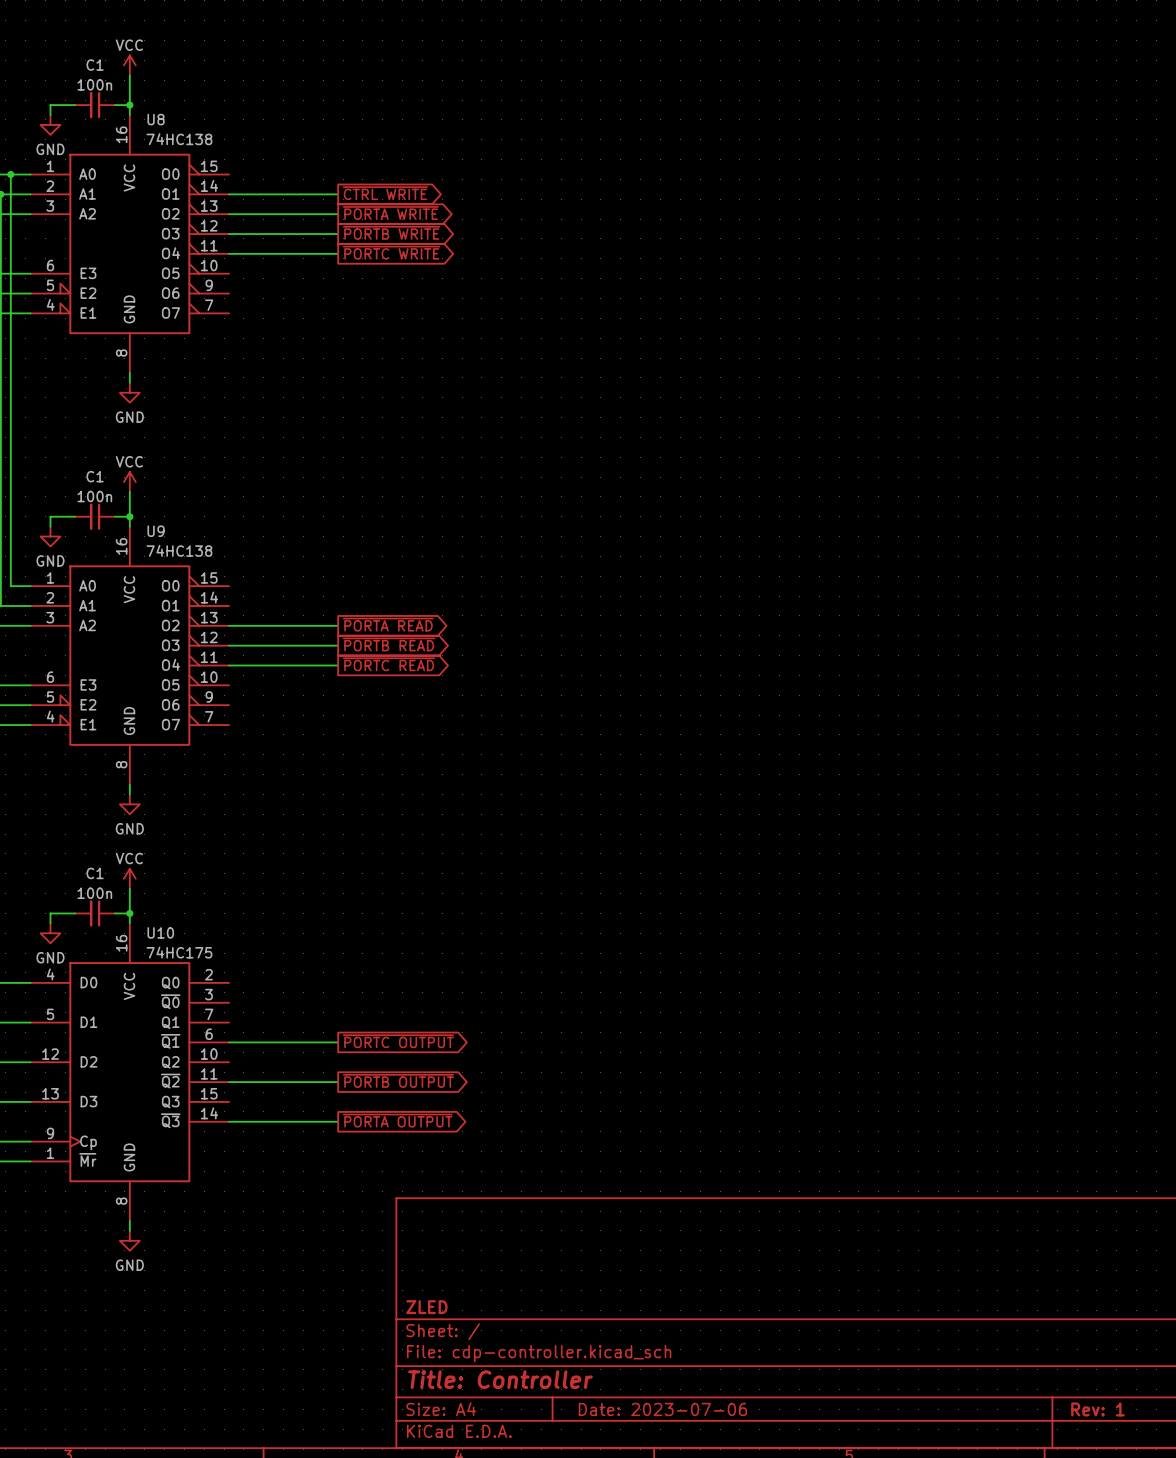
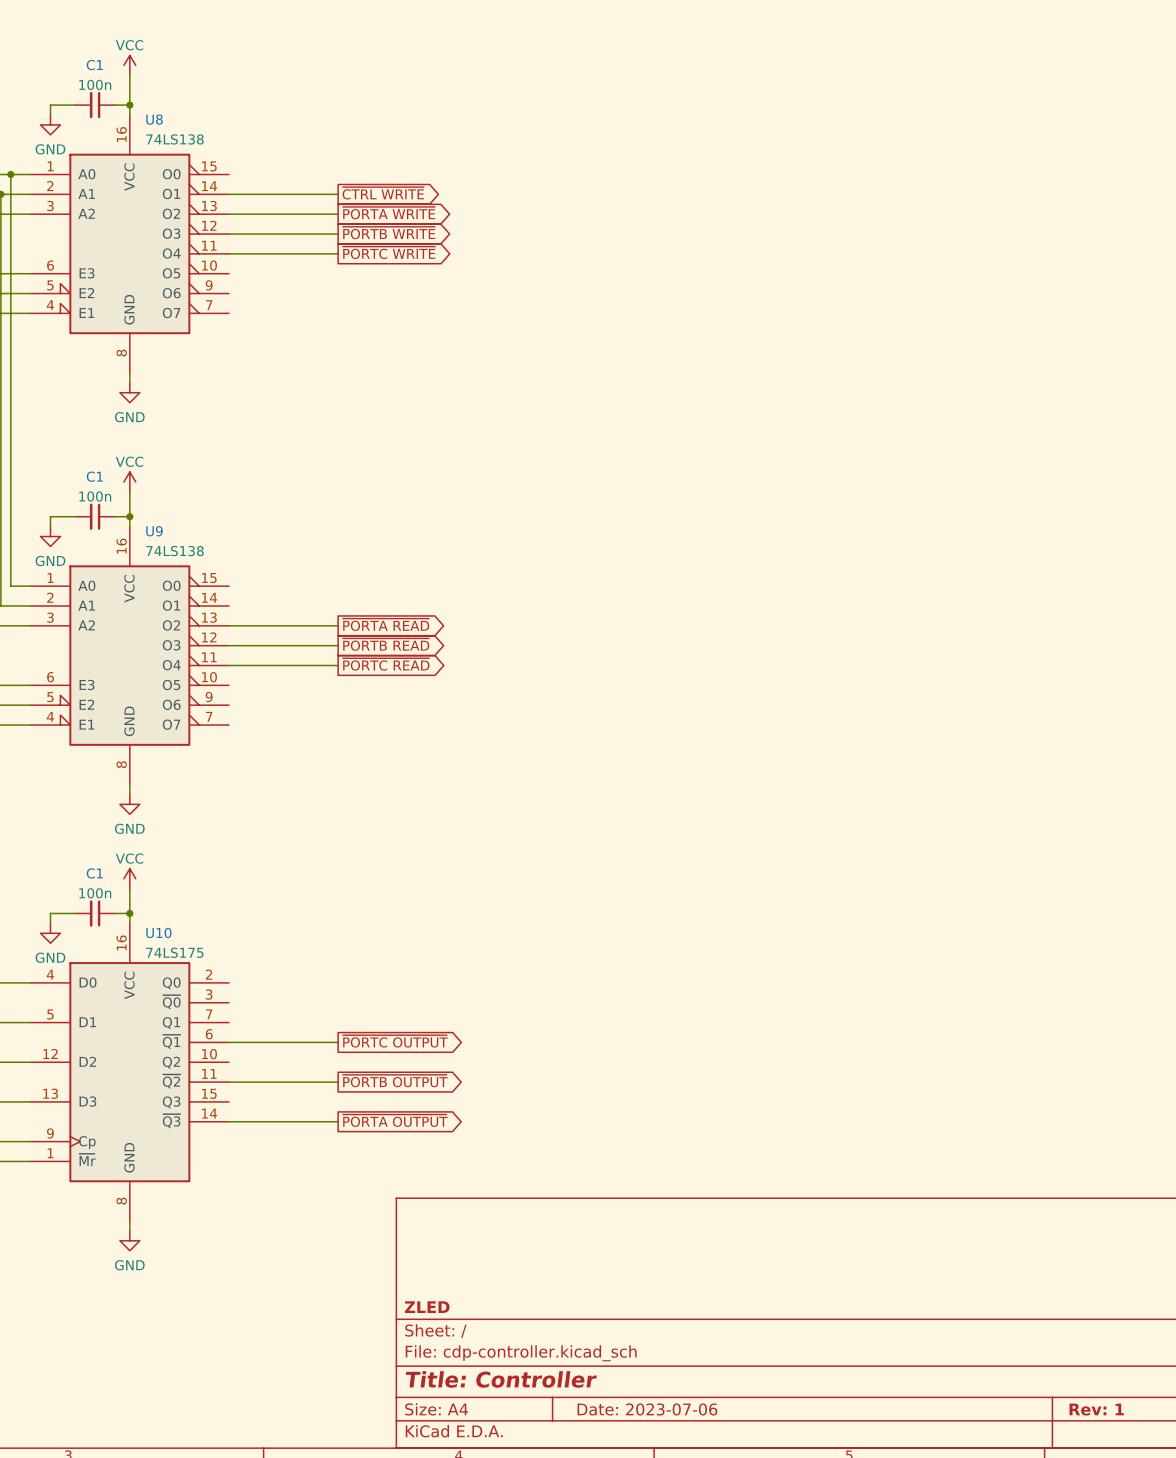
U8 value: 74HC138 (179, 139) -> 74LS138 (174, 139)
U9 value: 74HC138 (179, 550) -> 74LS138 (174, 551)
U10 value: 74HC175 (179, 952) -> 74LS175 (174, 952)

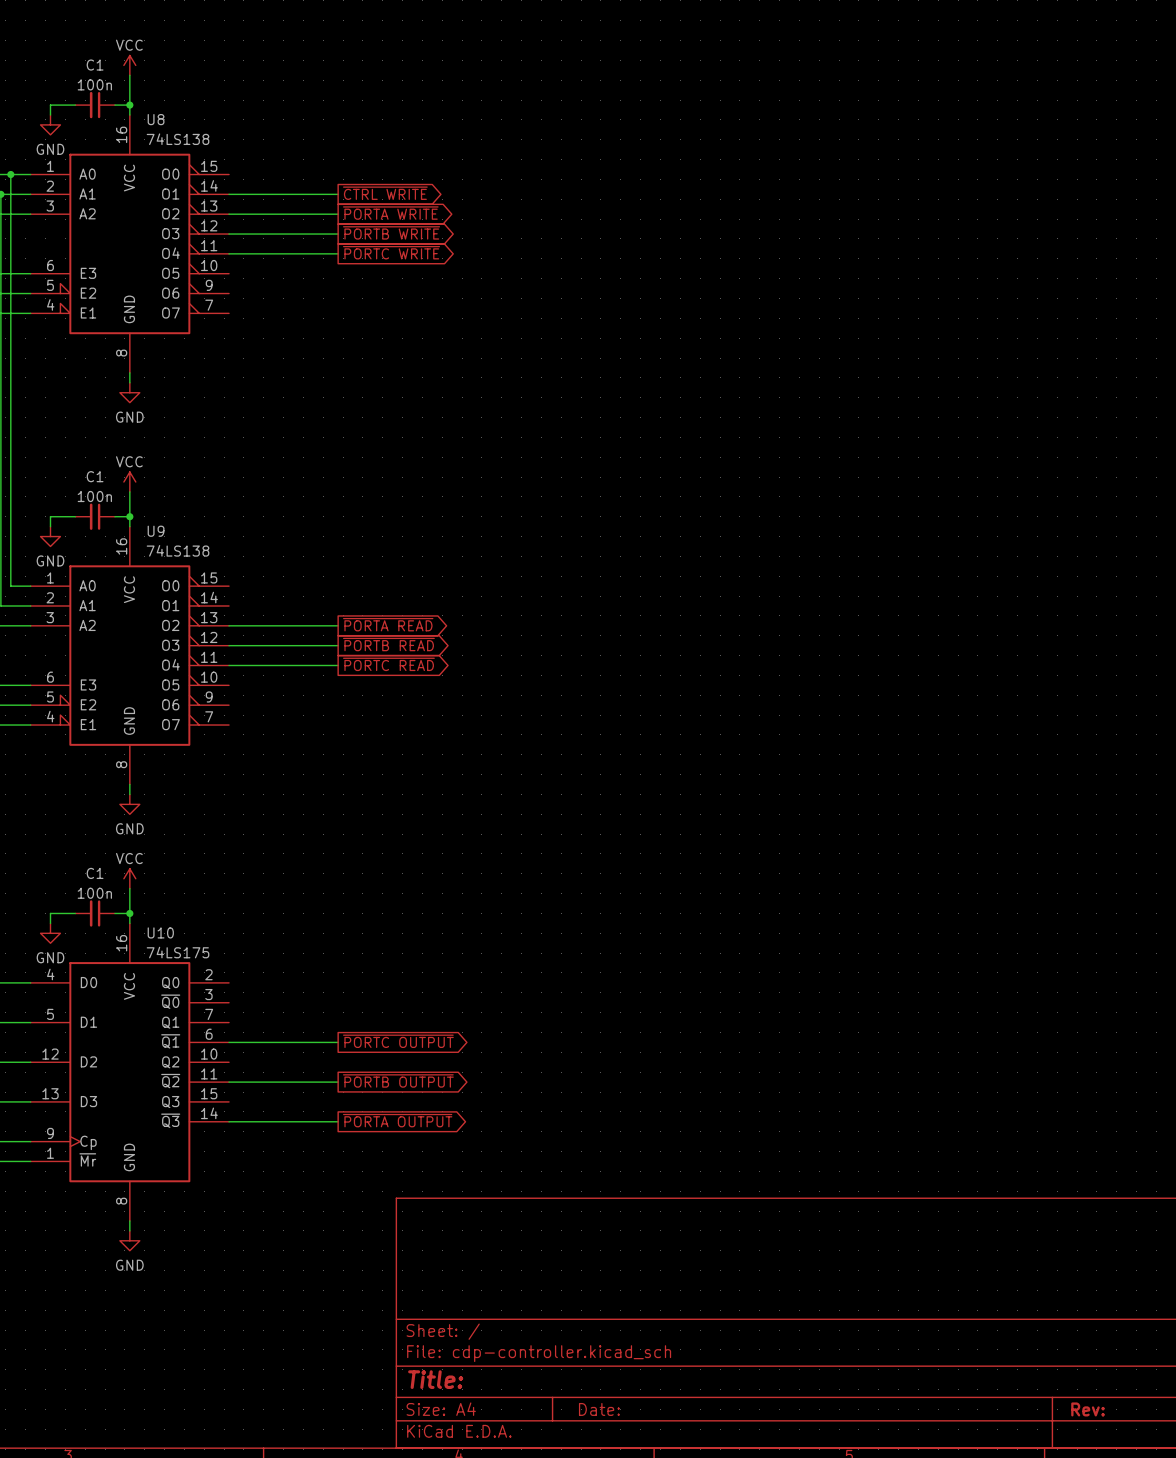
title block: ZLED (427, 1307) -> none
title block: Title: Controller (501, 1379) -> Title: (435, 1379)
title block: Date: 2023-07-06 (647, 1409) -> Date: (599, 1409)
title block: Rev: 1 (1096, 1409) -> Rev: (1087, 1409)

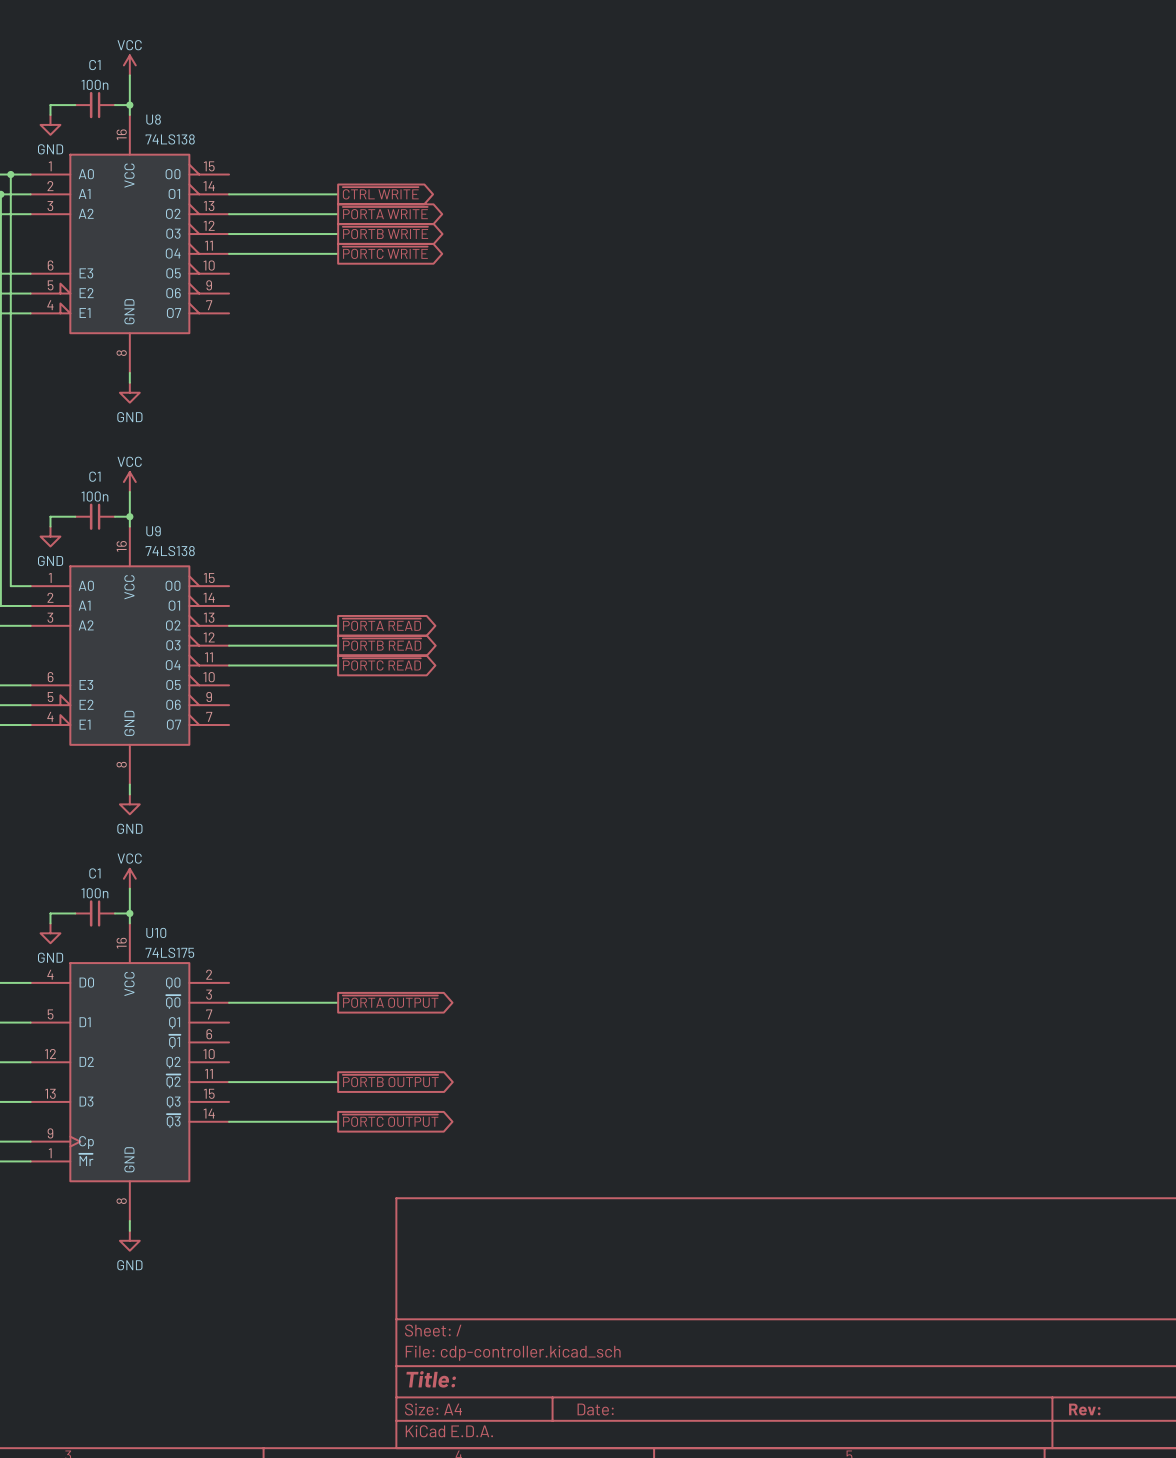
global label: none -> ~{PORTA OUTPUT} (390, 1001)
global label: ~{PORTC OUTPUT} (398, 1041) -> none
wire: (229, 1042) (338, 1042) -> (229, 1002) (338, 1002)
global label: ~{PORTA OUTPUT} (397, 1120) -> ~{PORTC OUTPUT} (390, 1120)

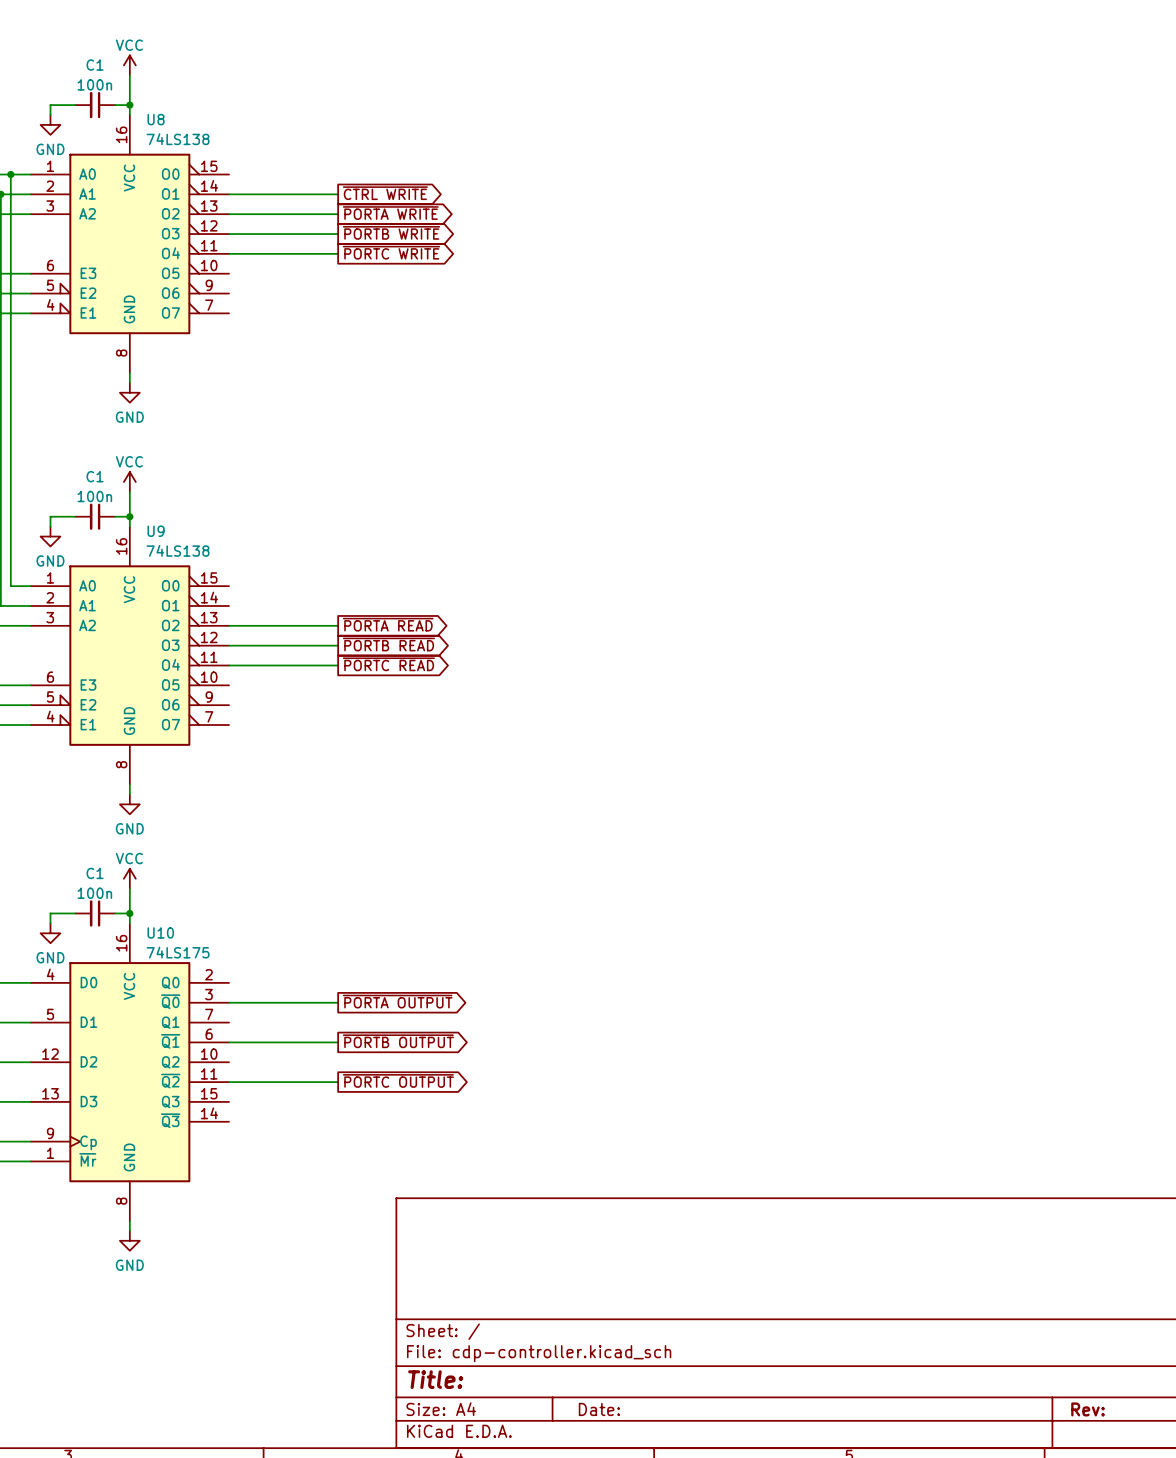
global label: none -> ~{PORTB OUTPUT} (398, 1041)
global label: ~{PORTB OUTPUT} (390, 1081) -> ~{PORTC OUTPUT} (398, 1080)
global label: ~{PORTC OUTPUT} (390, 1120) -> none
wire: (229, 1121) (338, 1121) -> (229, 1042) (338, 1042)

